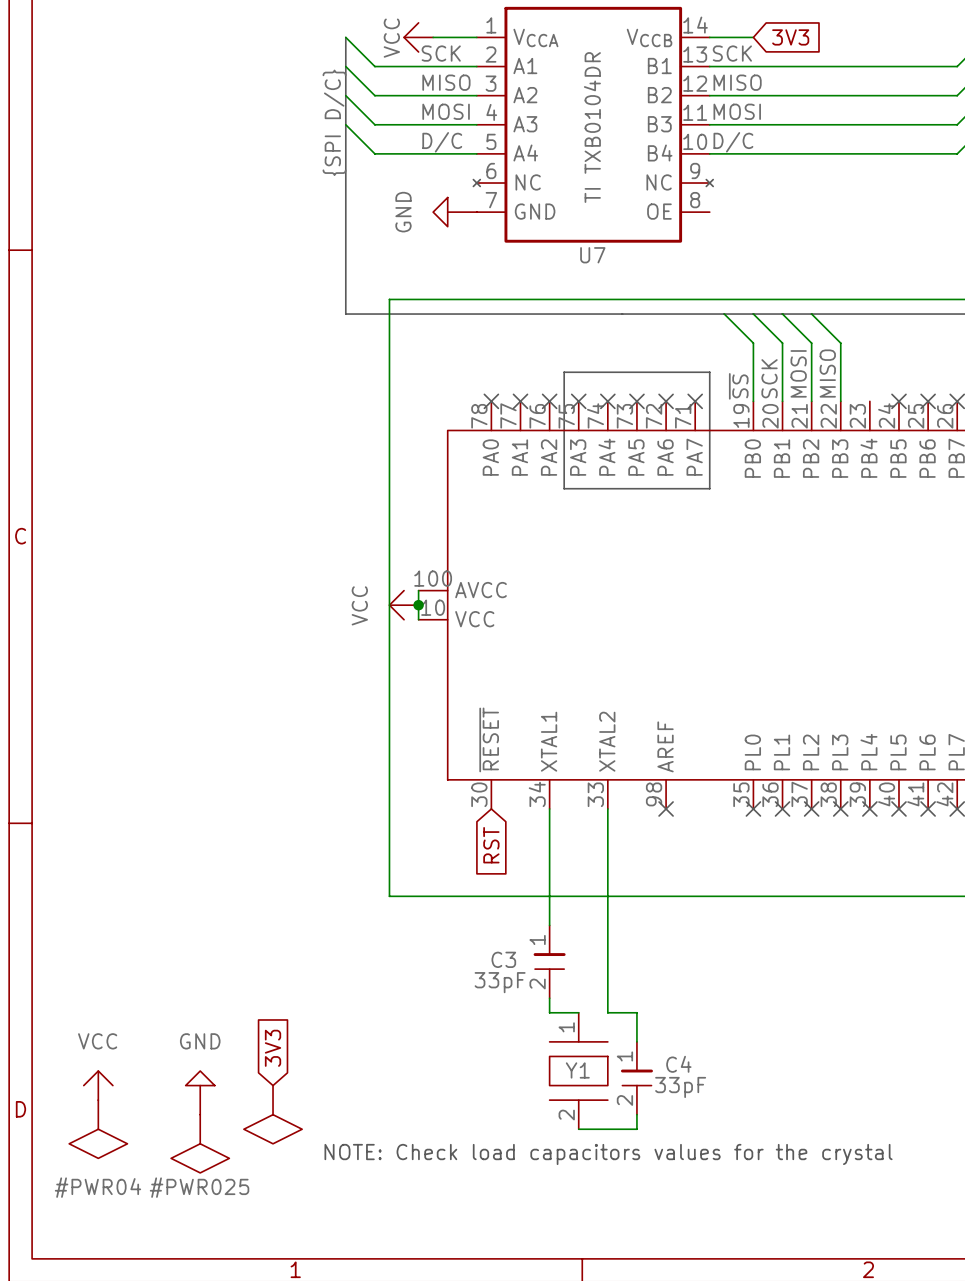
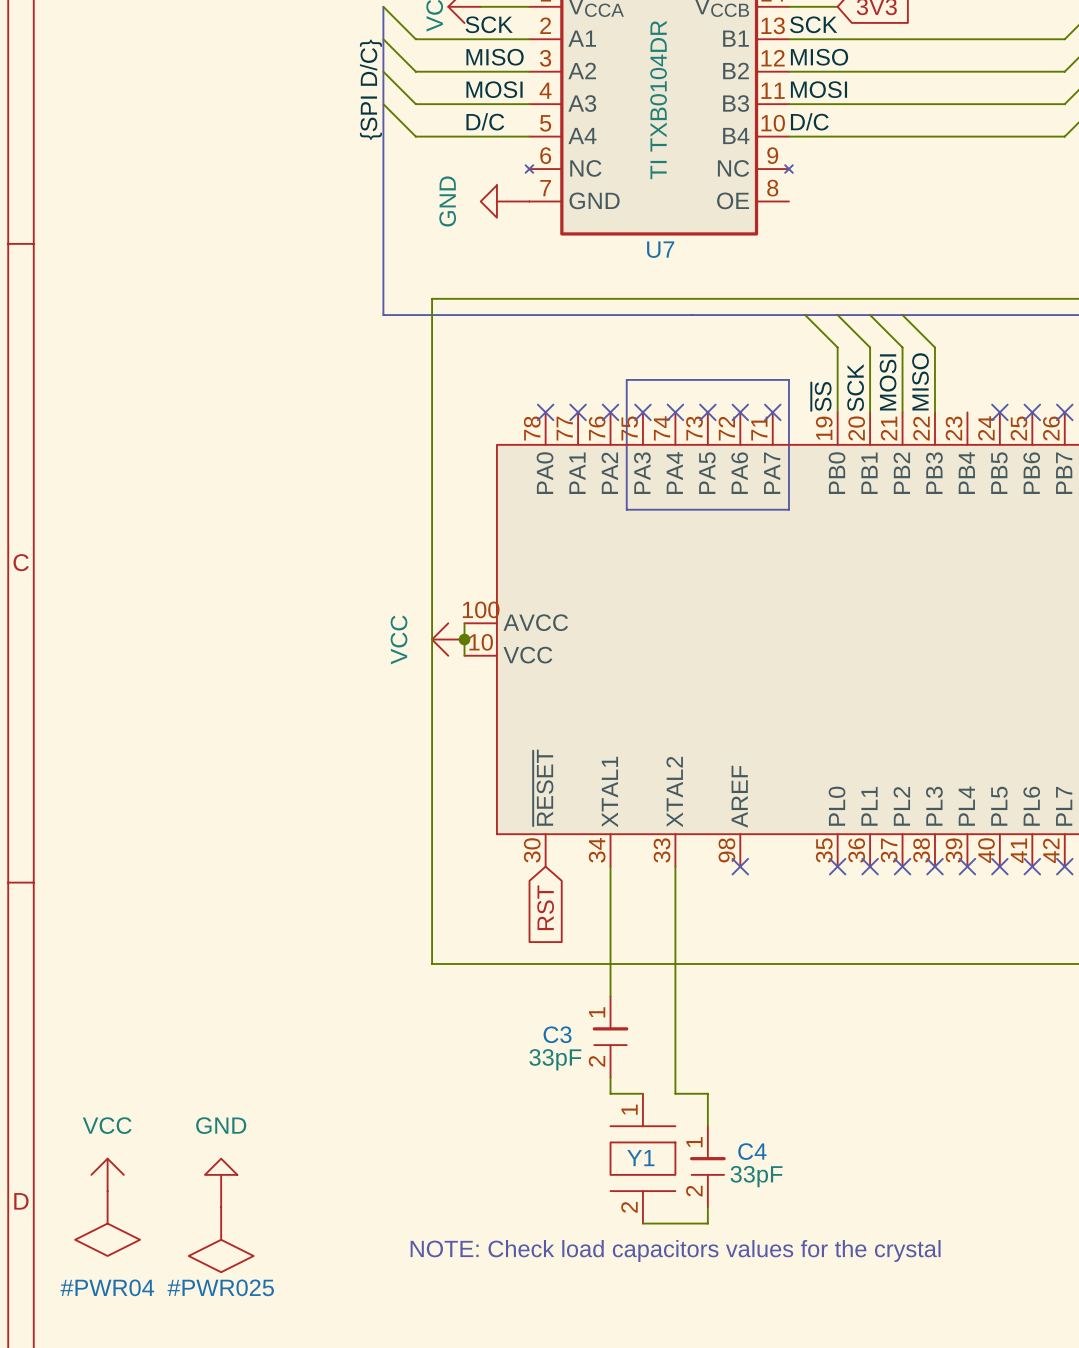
global label: 3V3 (273, 1048) -> none
power symbol: (273, 1114) -> none

